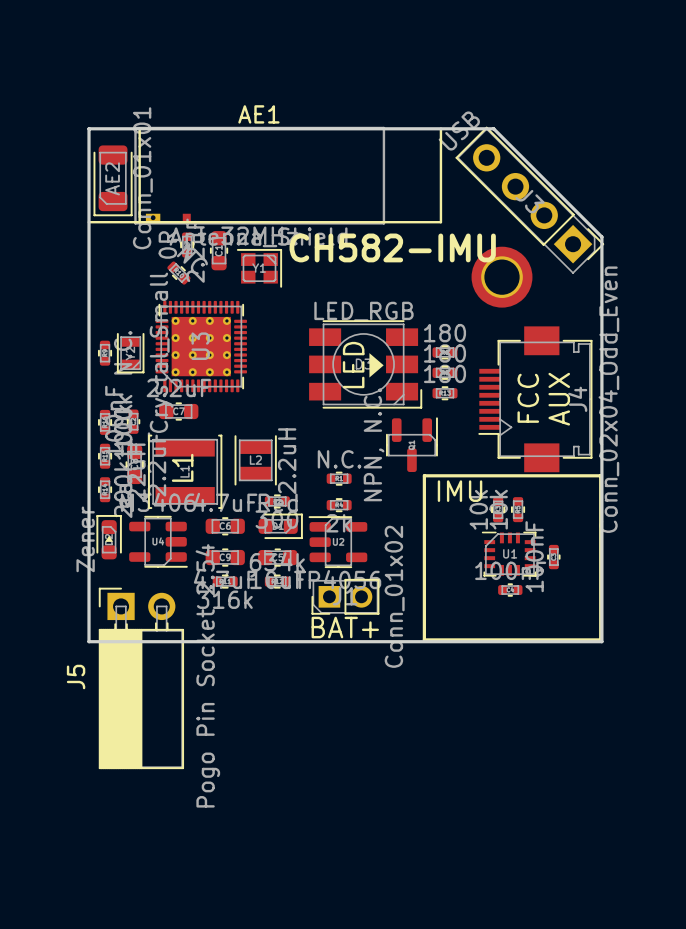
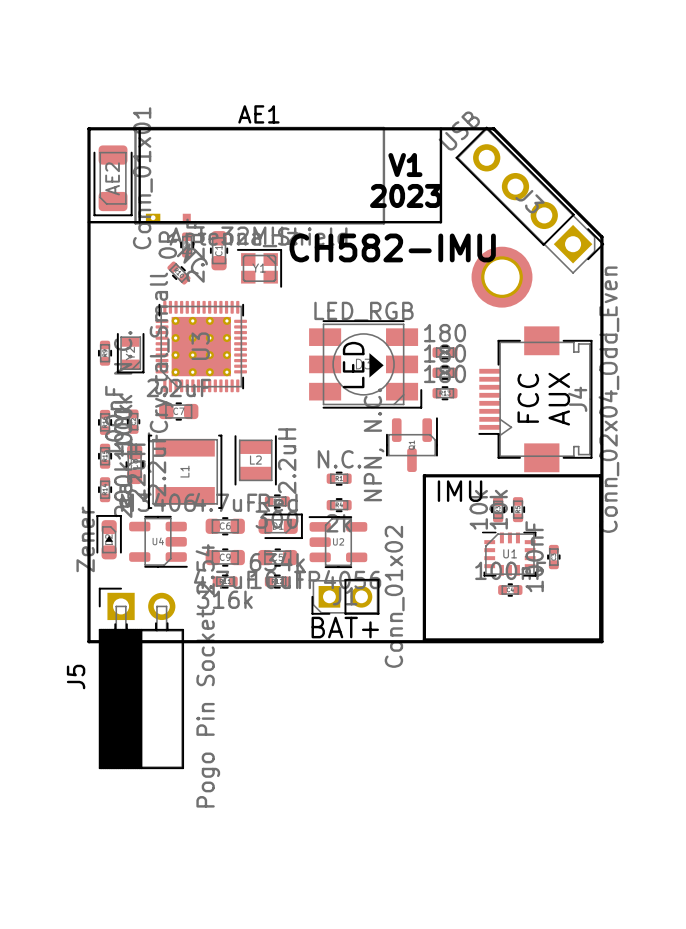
text: none -> V1 (405, 165)
text: none -> 2023 (405, 195)
text: L1 (182, 467) -> none

